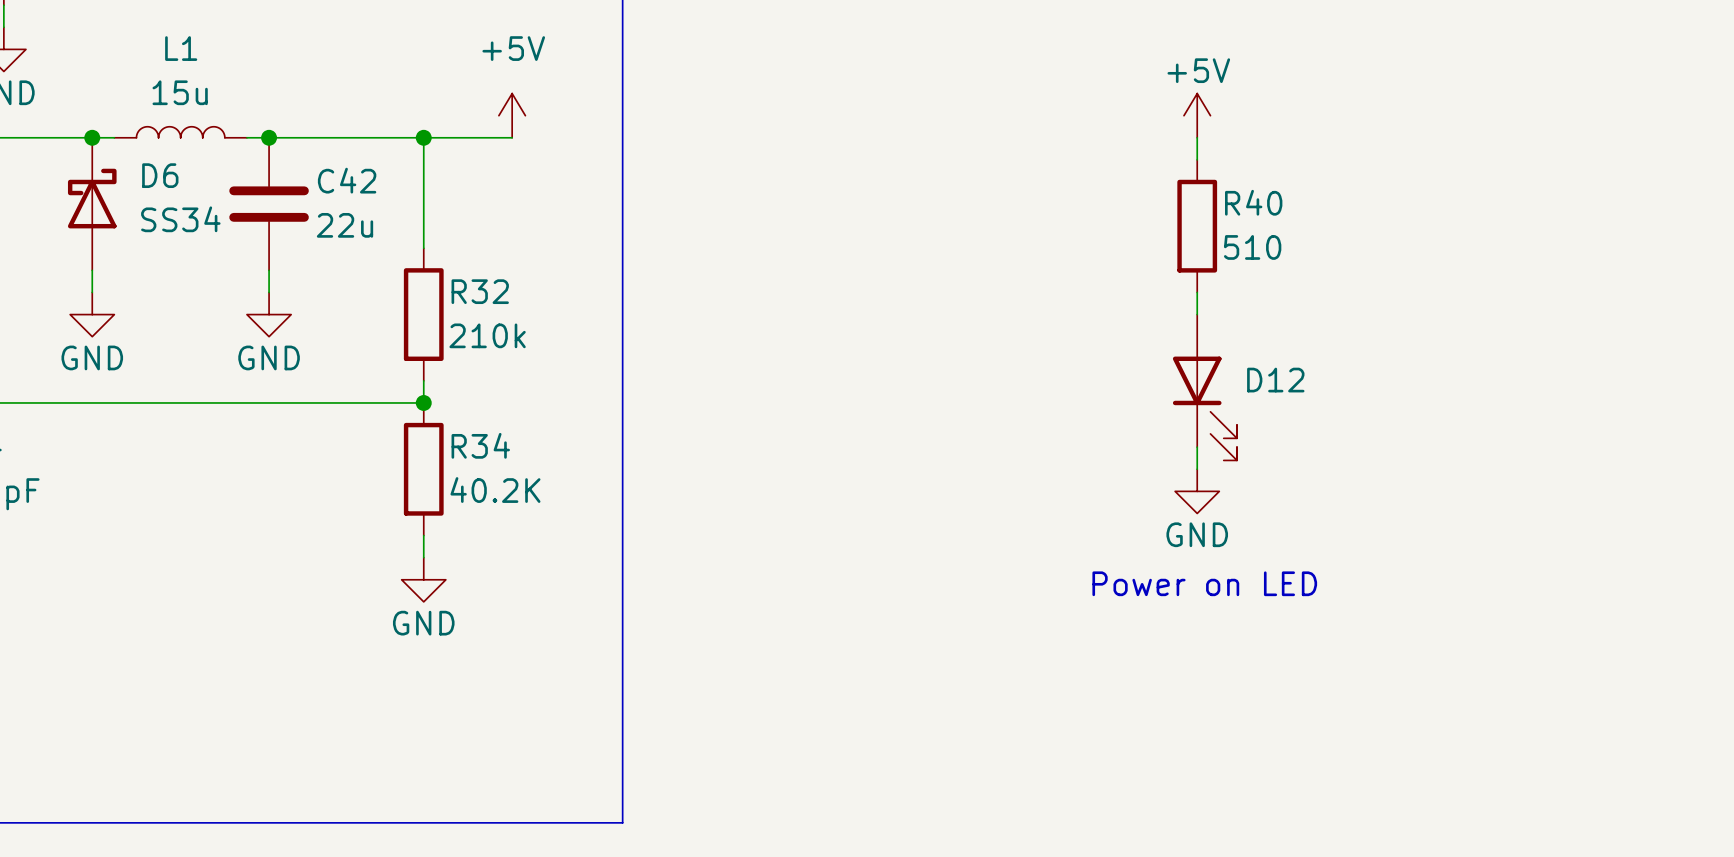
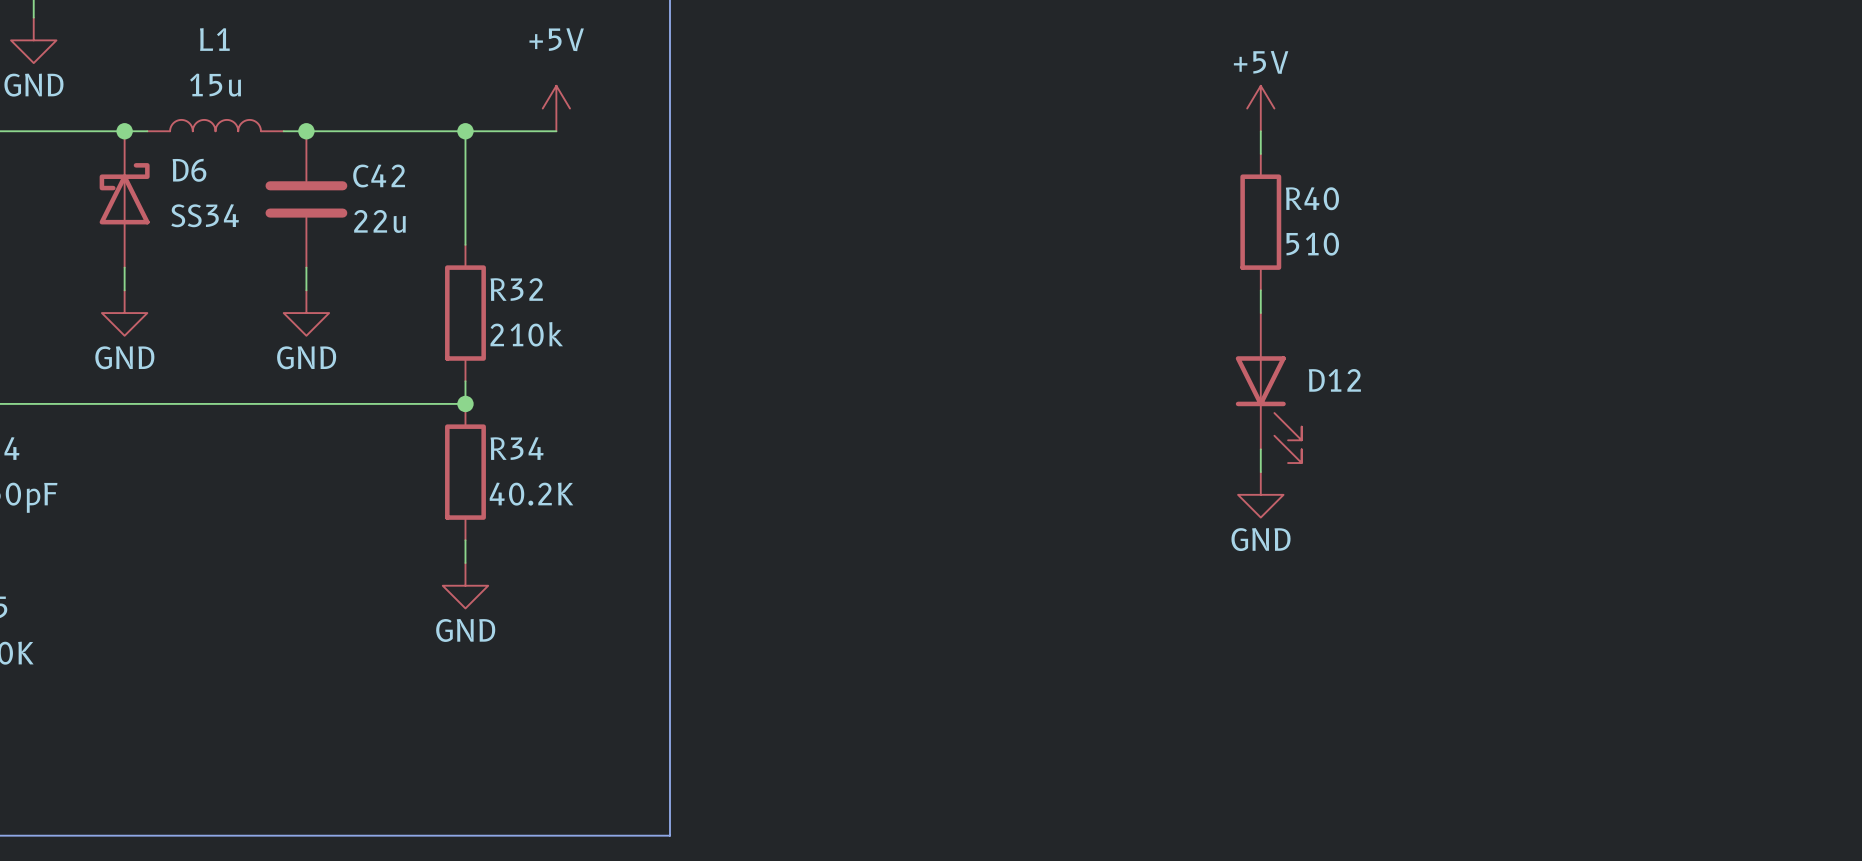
text: Power on LED (1204, 583) -> none

